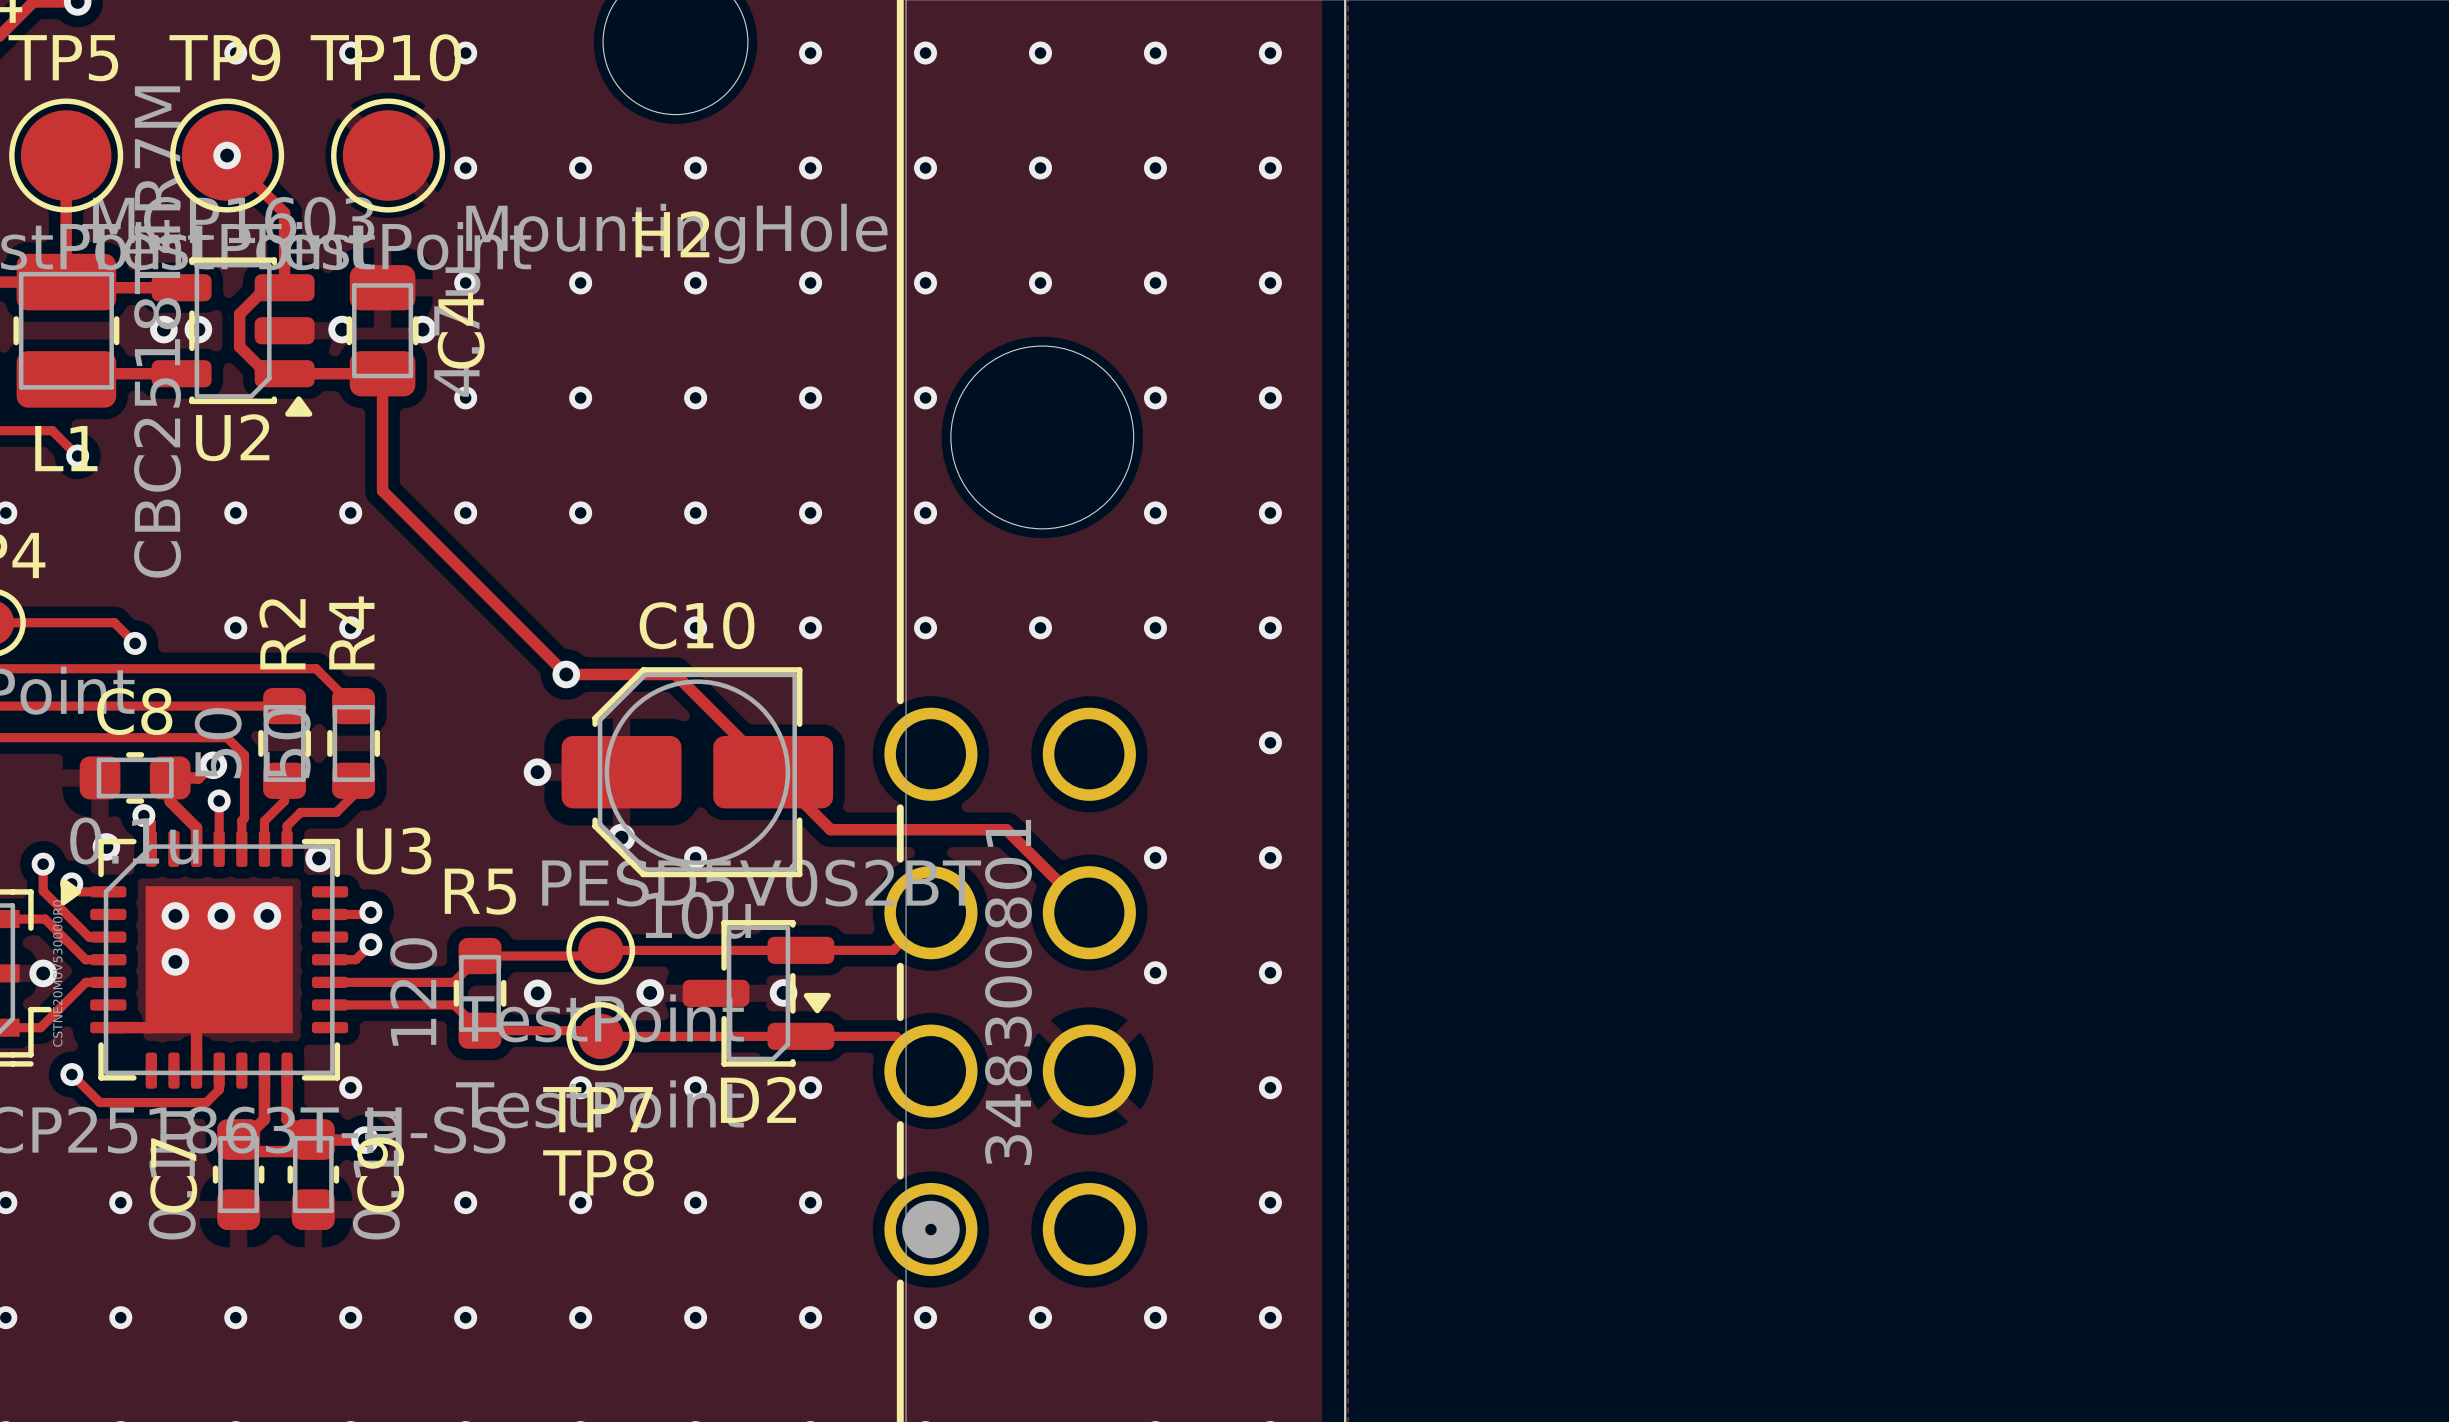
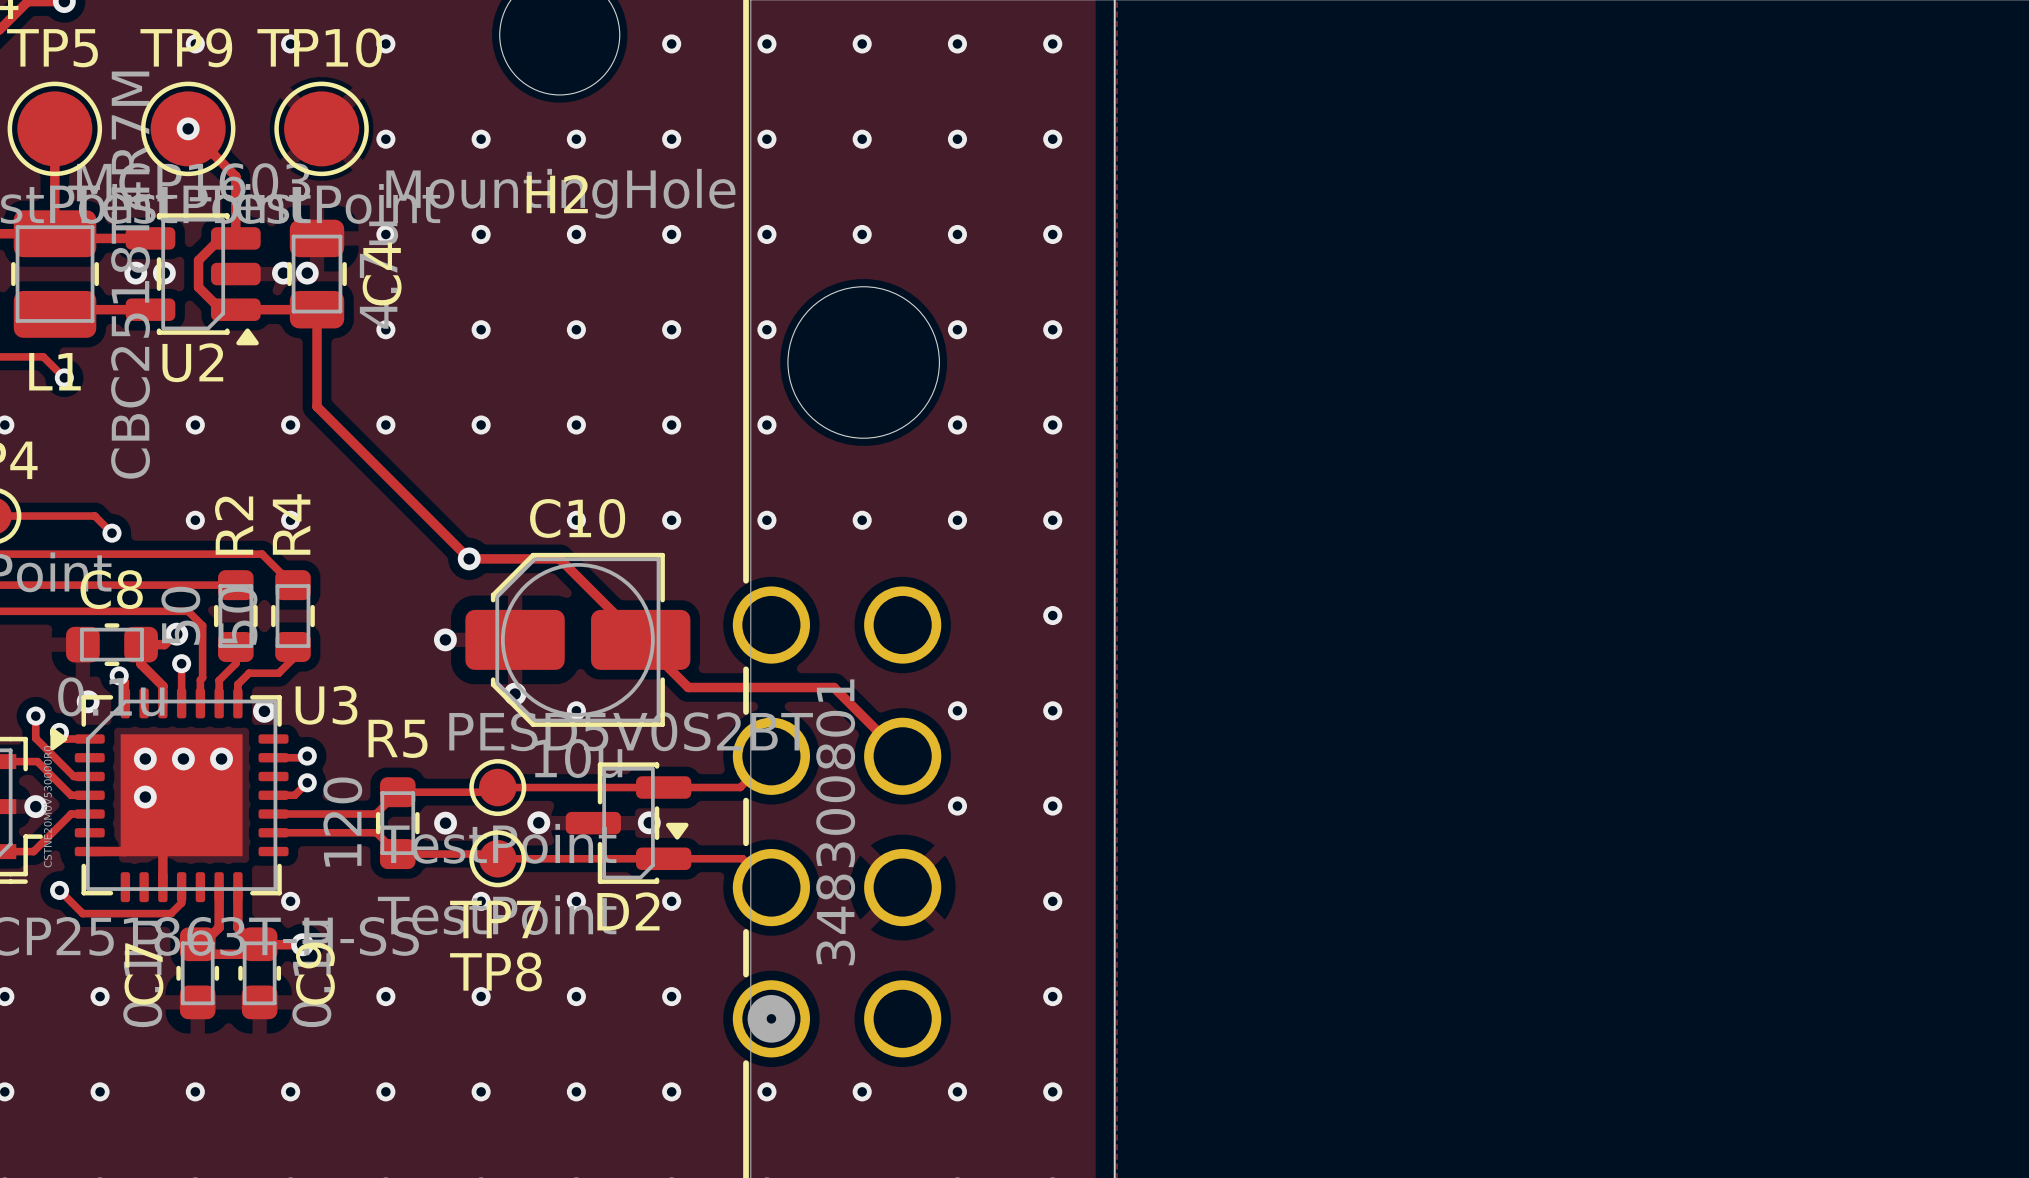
via position: (422, 329) -> (307, 273)

